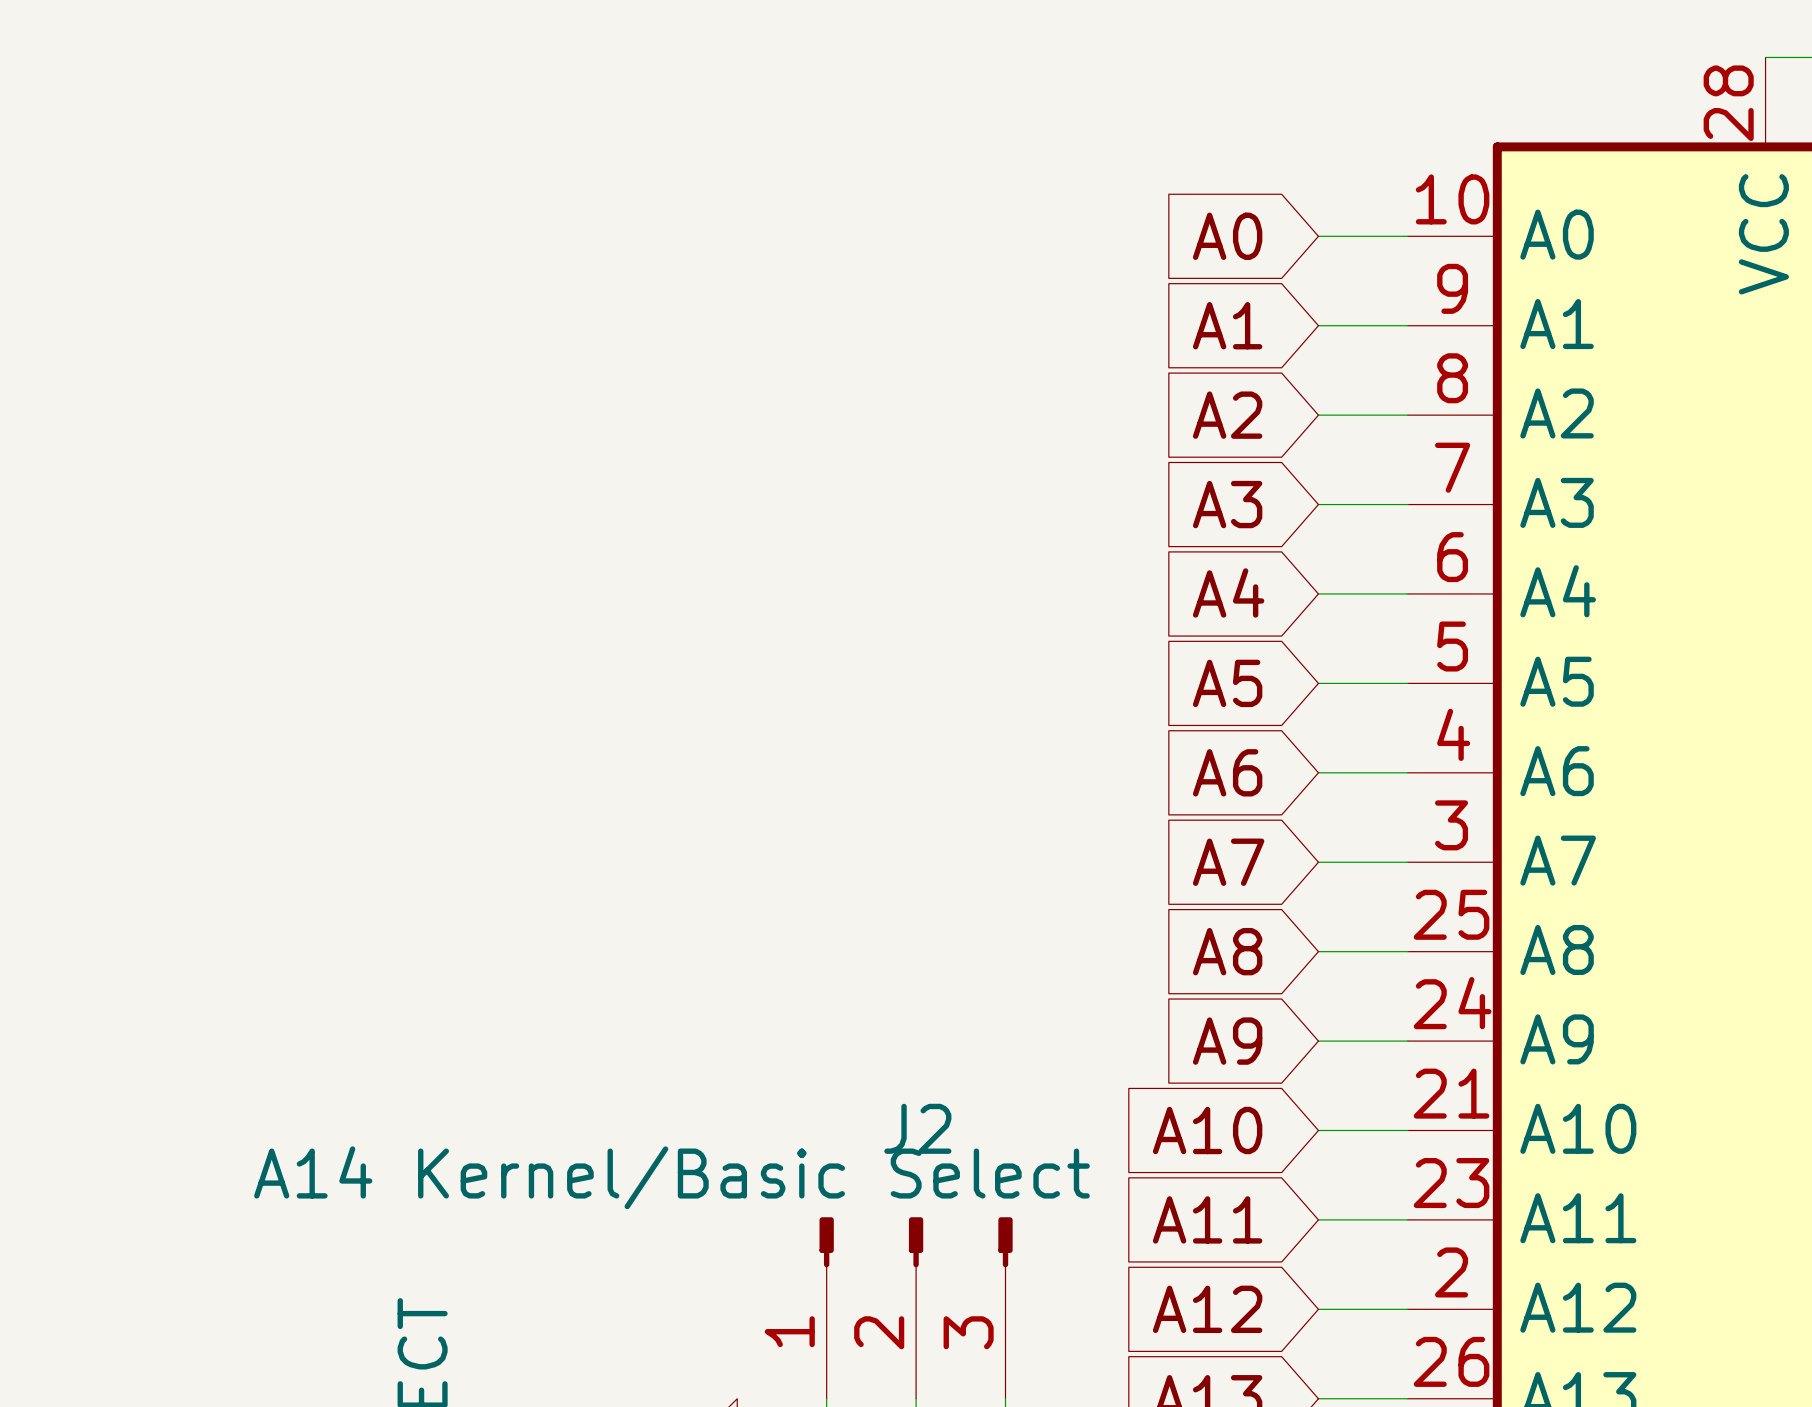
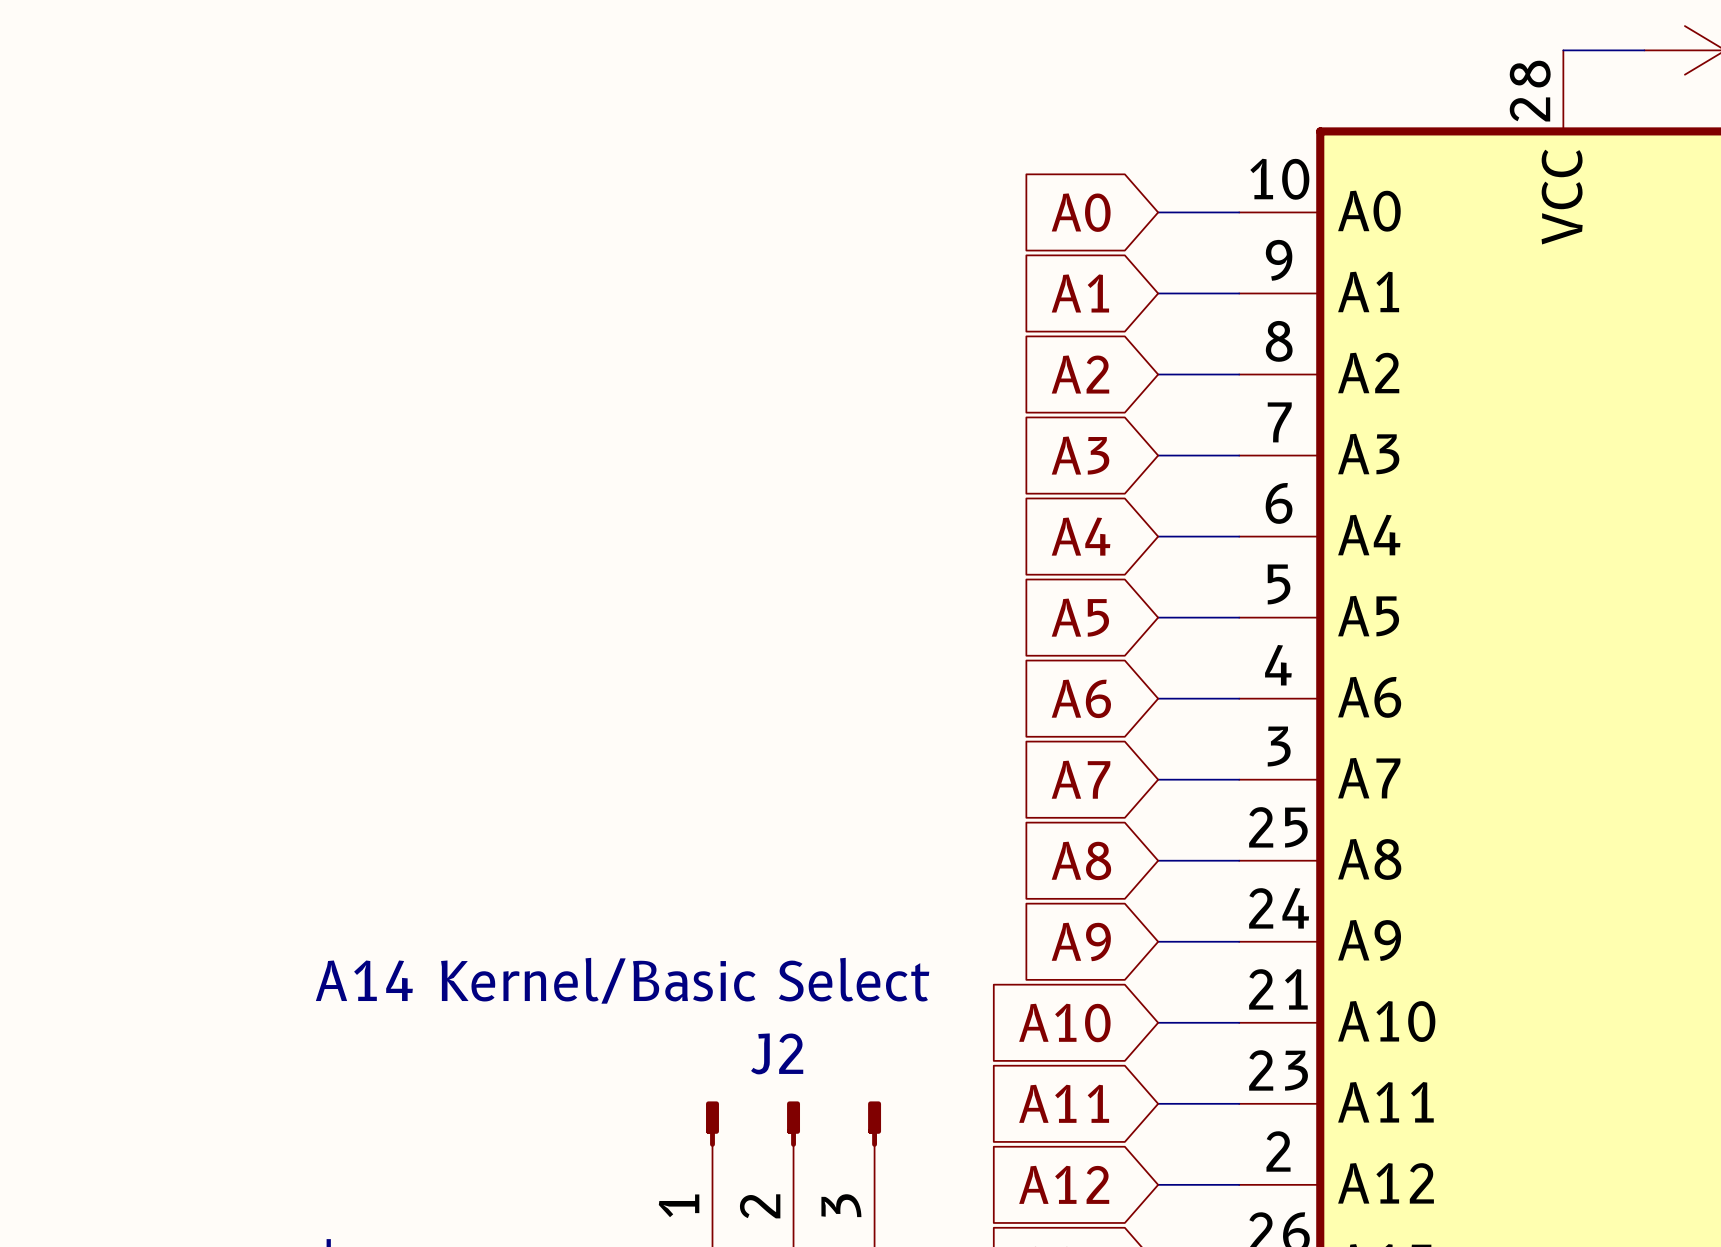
J2 name position: J2 (917, 1128) -> J2 (777, 1053)
J2 value position: A14 Kernel/Basic Select (671, 1177) -> A14 Kernel/Basic Select (622, 980)

